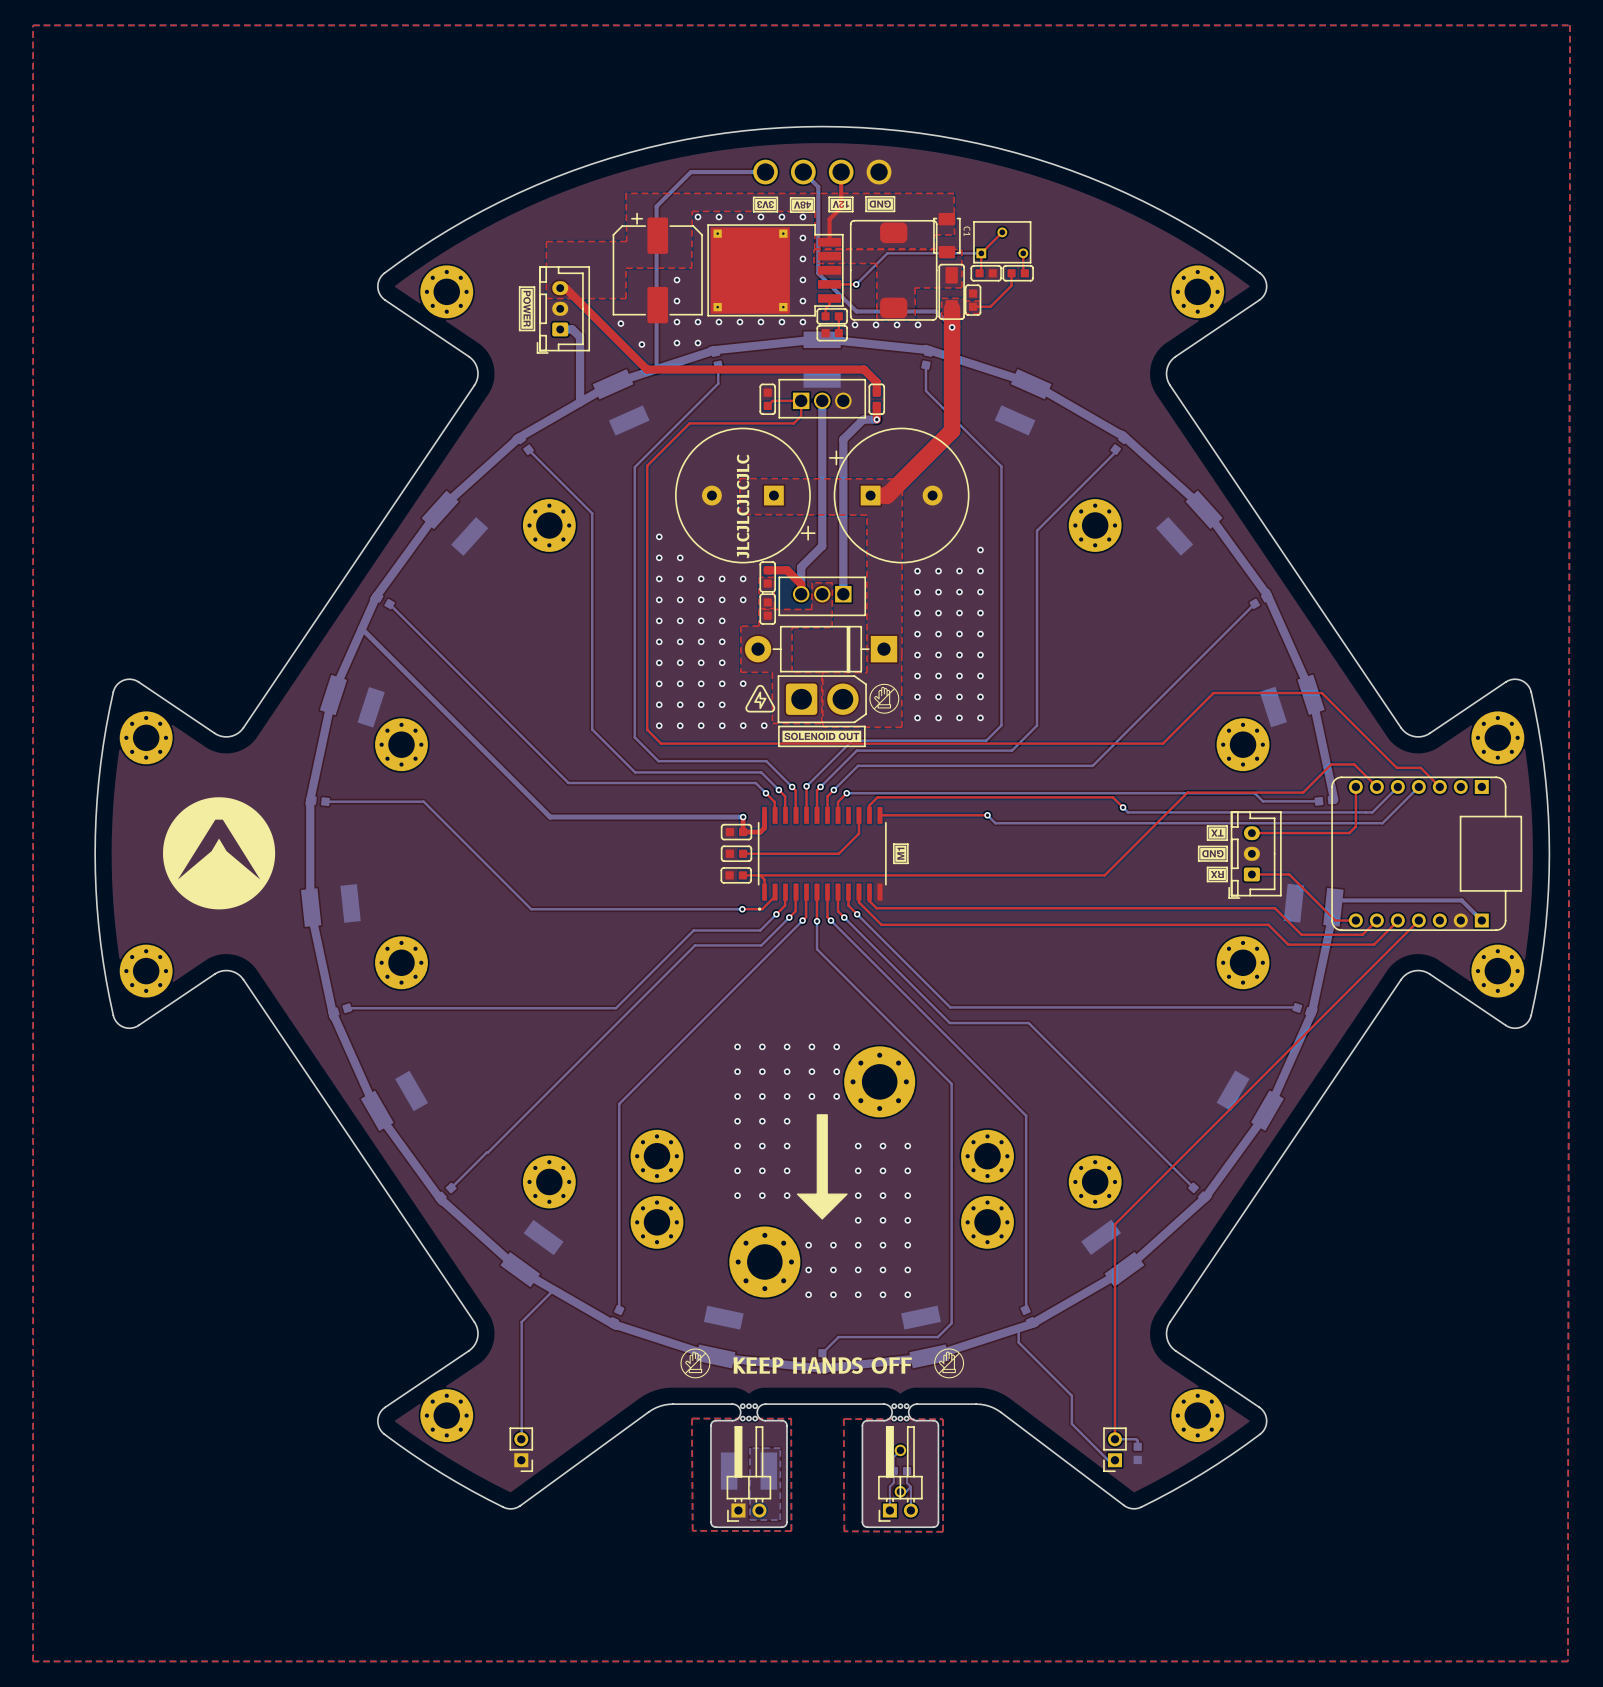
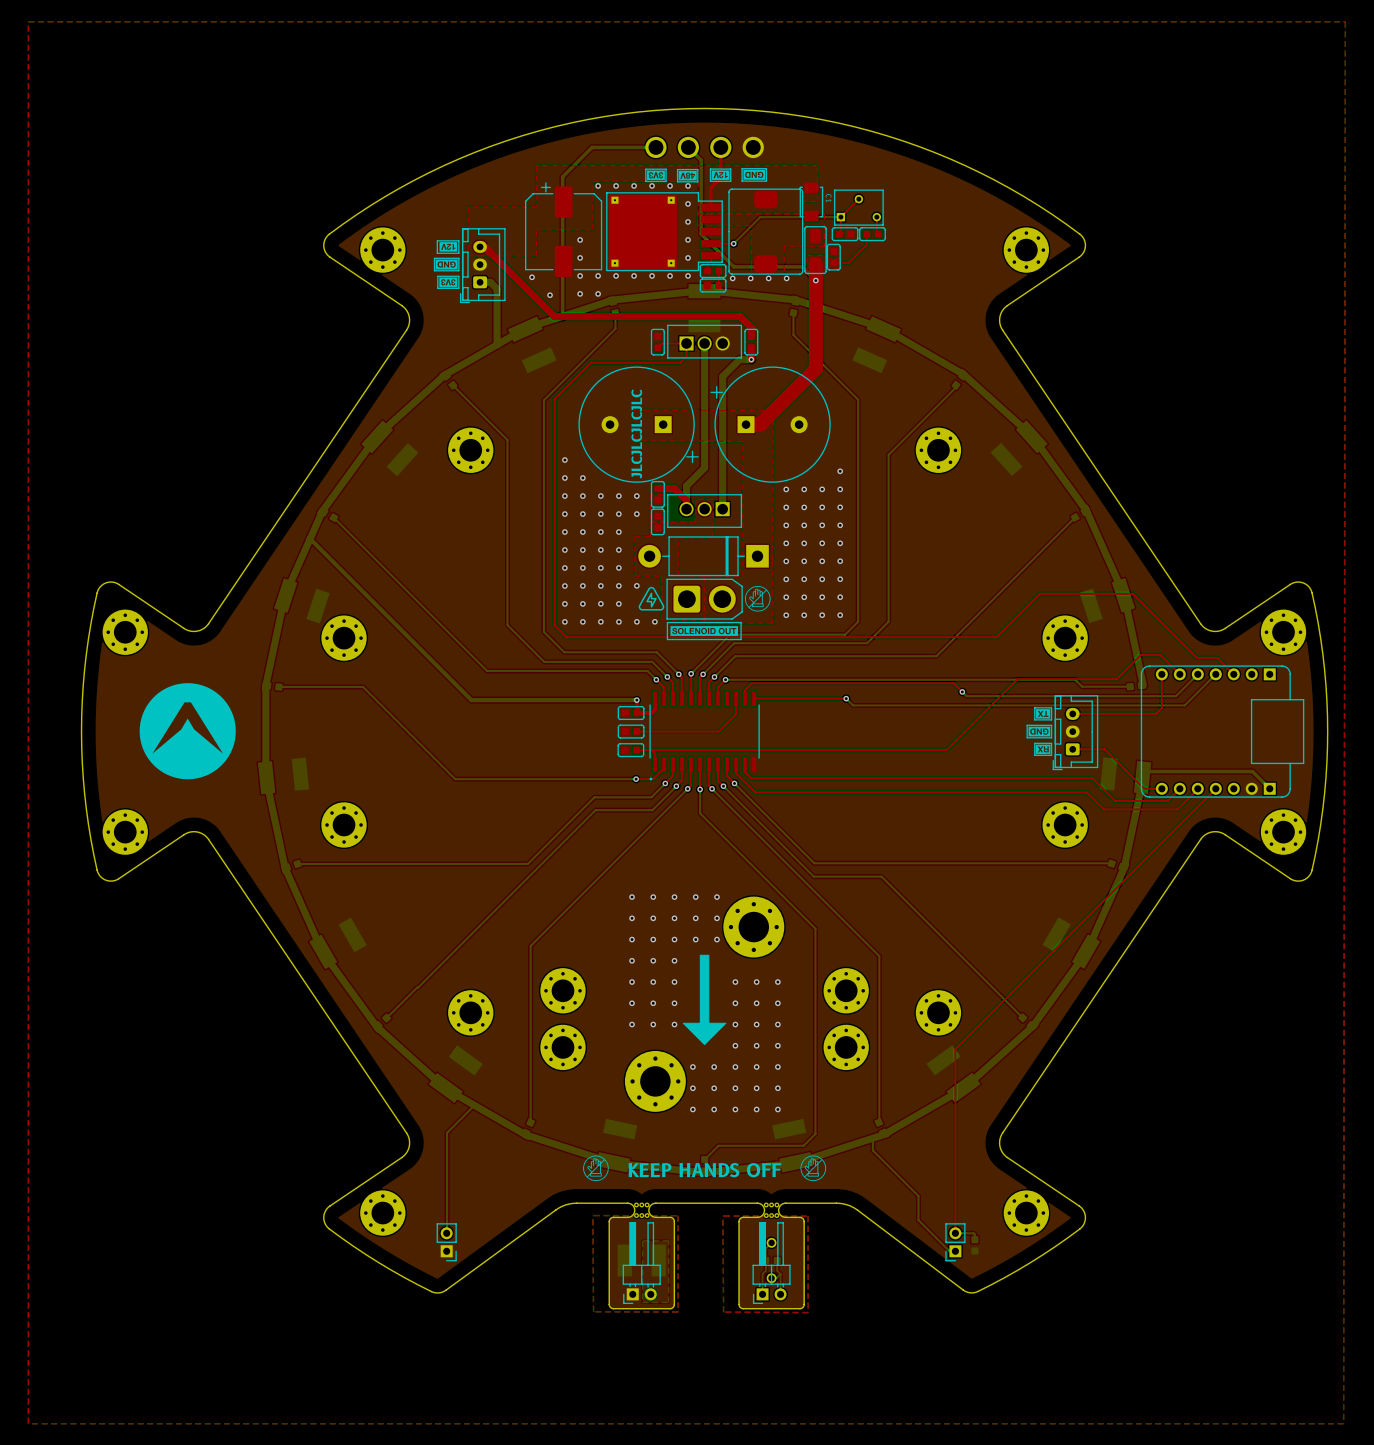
line: none -> (437, 240) (458, 240) (458, 253) (437, 253) (437, 240)
drawing: none -> [439, 242, 458, 252]
line: (519, 287) (534, 287) (534, 330) (519, 330) (519, 287) -> none
drawing shape: [521, 288, 533, 329] -> [435, 259, 458, 270]
line: none -> (434, 258) (458, 258) (458, 270) (434, 270) (434, 258)
line: none -> (437, 276) (437, 288) (458, 288) (458, 276) (437, 276)
drawing: none -> [439, 277, 458, 288]
line: (893, 844) (907, 844) (907, 863) (893, 863) (893, 844) -> none
drawing: [895, 845, 907, 862] -> none

